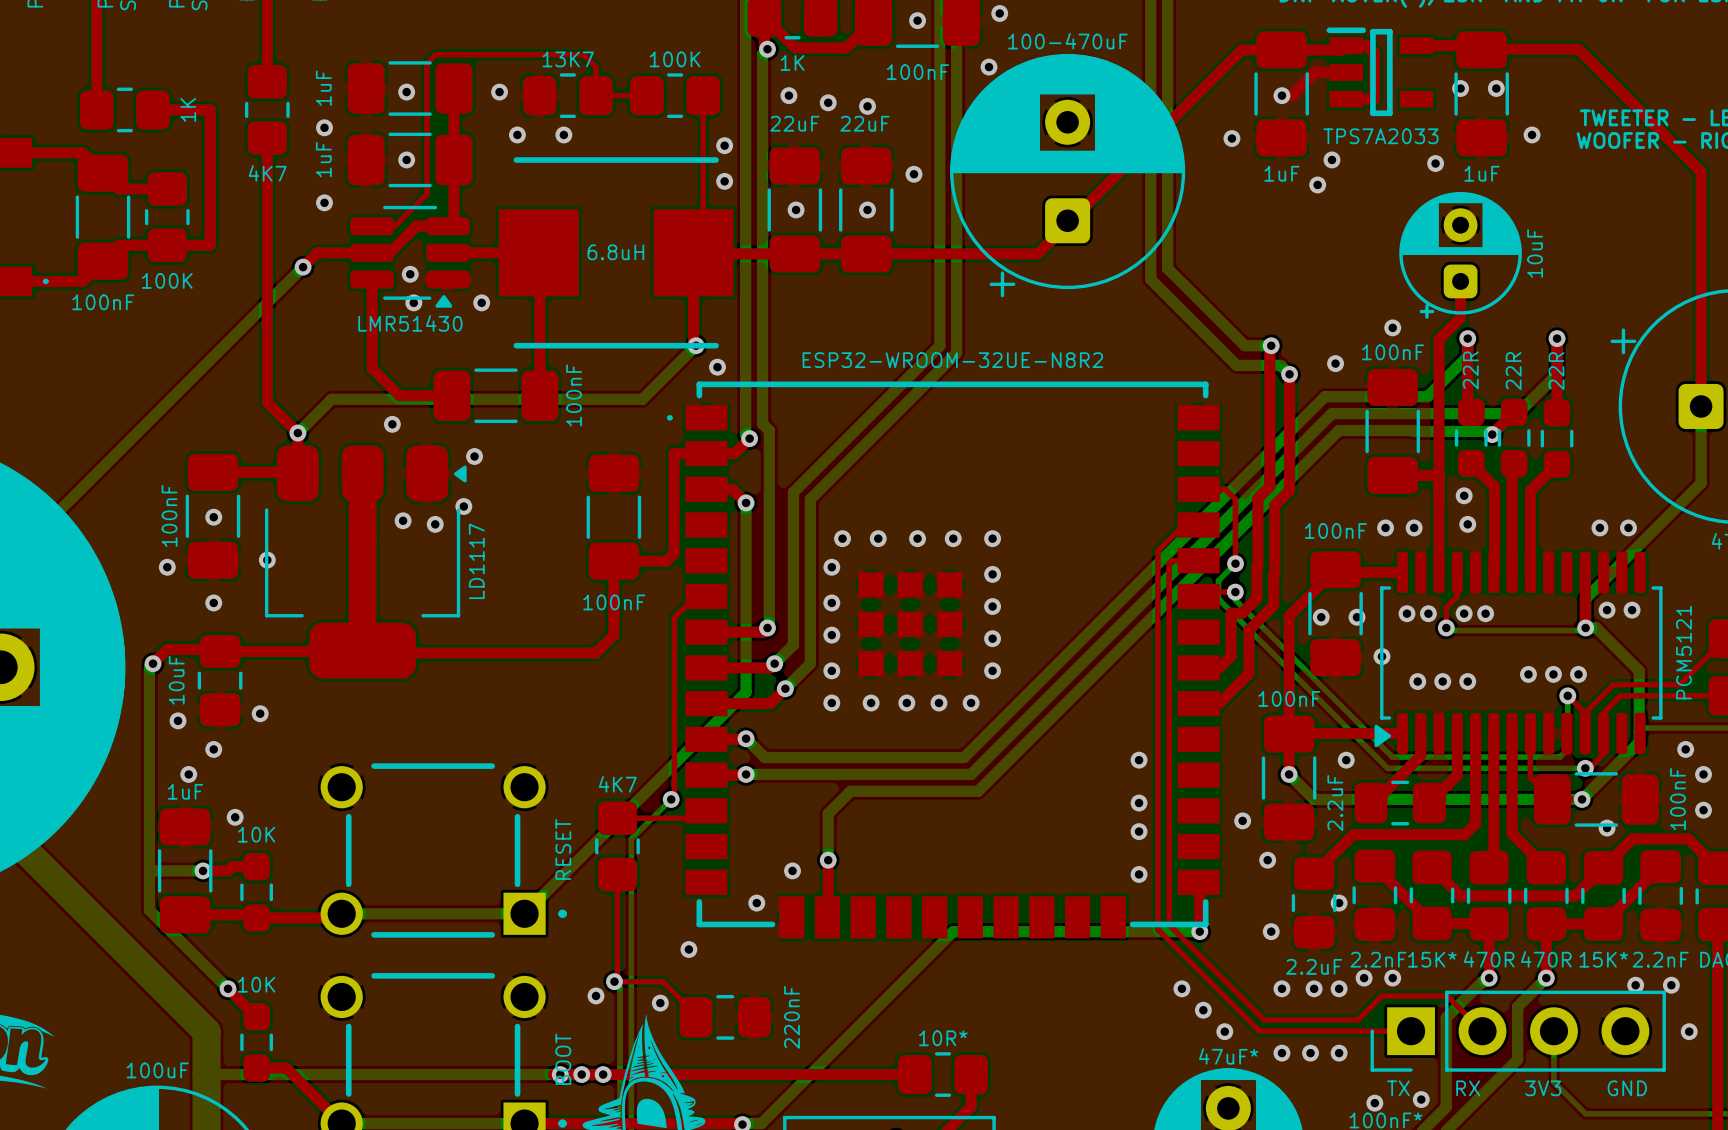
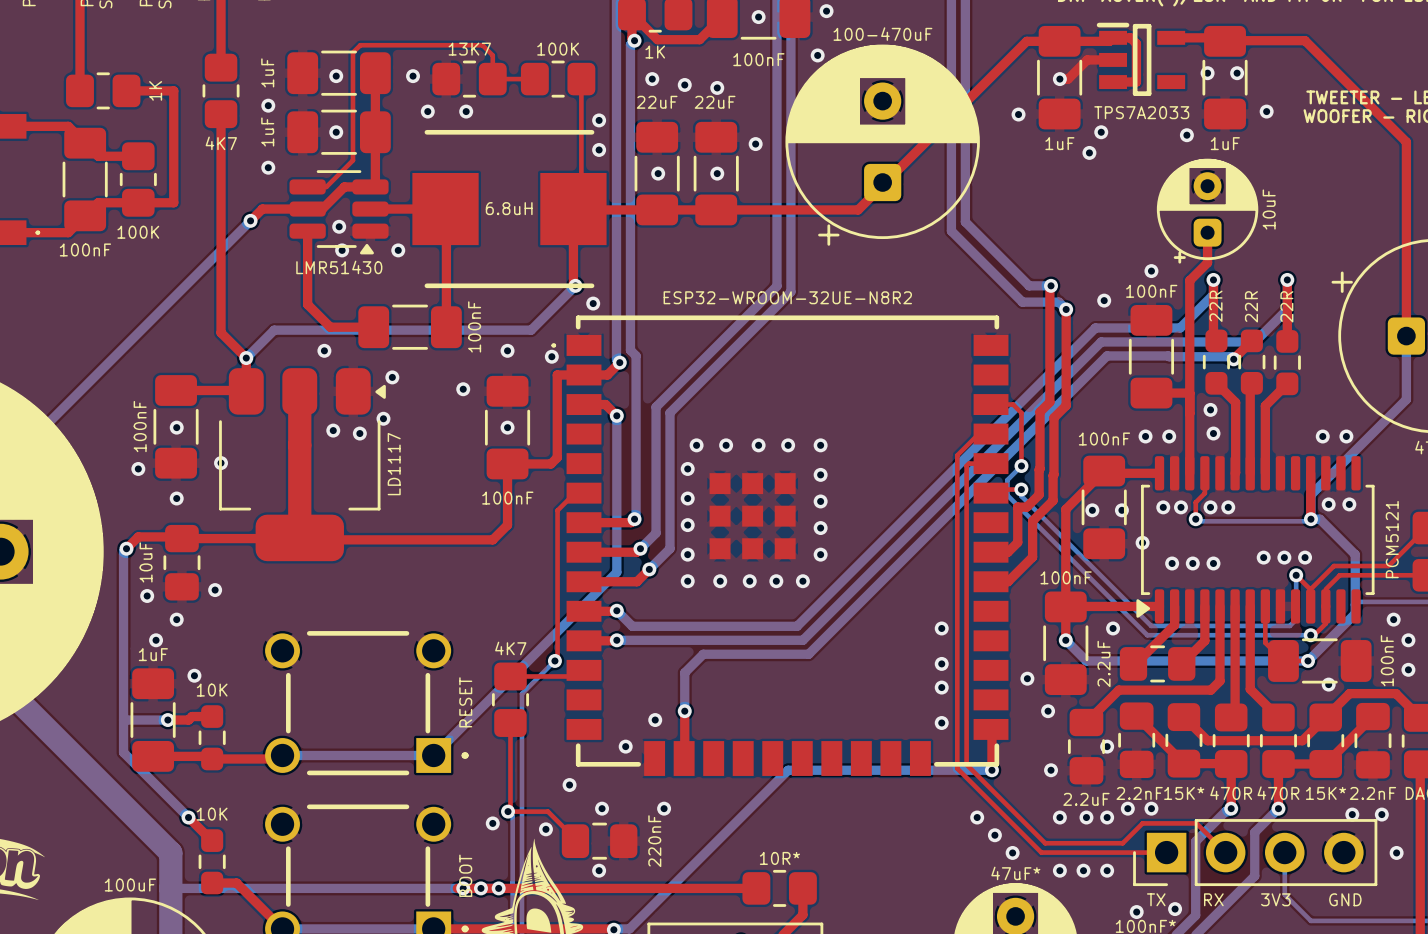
via: none -> (507, 350)
via: none -> (551, 356)
via: none -> (463, 389)
via: none -> (507, 427)
via: none -> (602, 808)
via: none -> (664, 808)
via: none -> (599, 870)

